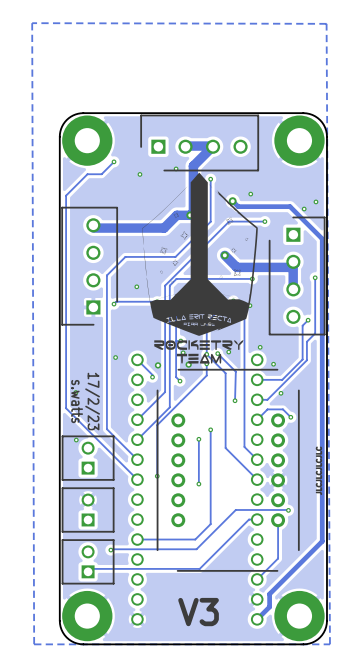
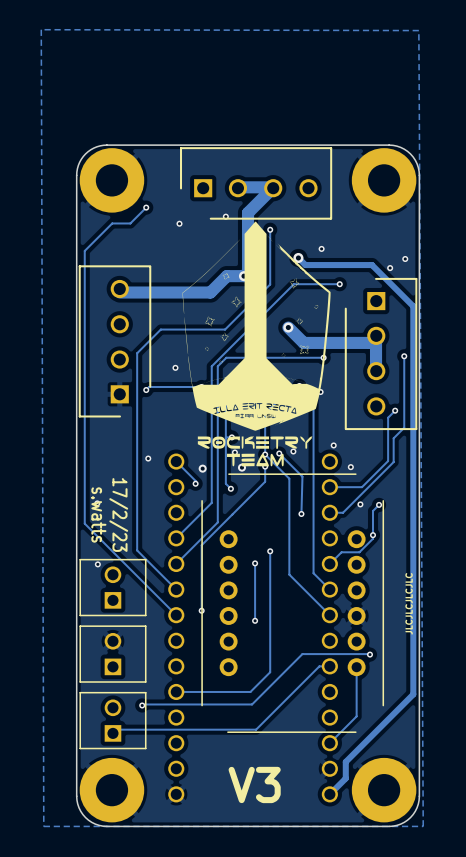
track: none -> (379, 504) (373, 510) (373, 538) (359, 552) (341, 552) (329, 563)
via: none -> (379, 504)
track: (290, 417) (282, 409) (267, 409) (257, 419) -> none

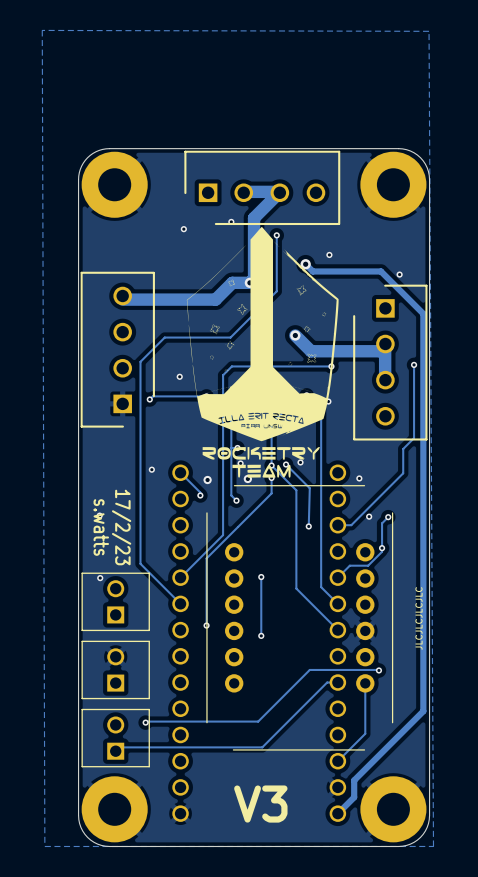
track: (146, 207) (130, 223) (112, 223) (84, 250) (84, 523) (176, 615) -> none
via: (146, 207) -> none
via: (405, 259) -> none
track: (339, 284) (293, 284) (211, 366) (211, 502) (176, 538) -> none
via: (339, 284) -> none
track: (395, 410) (388, 417) (388, 461) (362, 487) (329, 487) -> none
via: (395, 410) -> none
via: (333, 445) -> none
track: (270, 551) (270, 672) (250, 691) (176, 691) -> none
via: (270, 551) -> none

